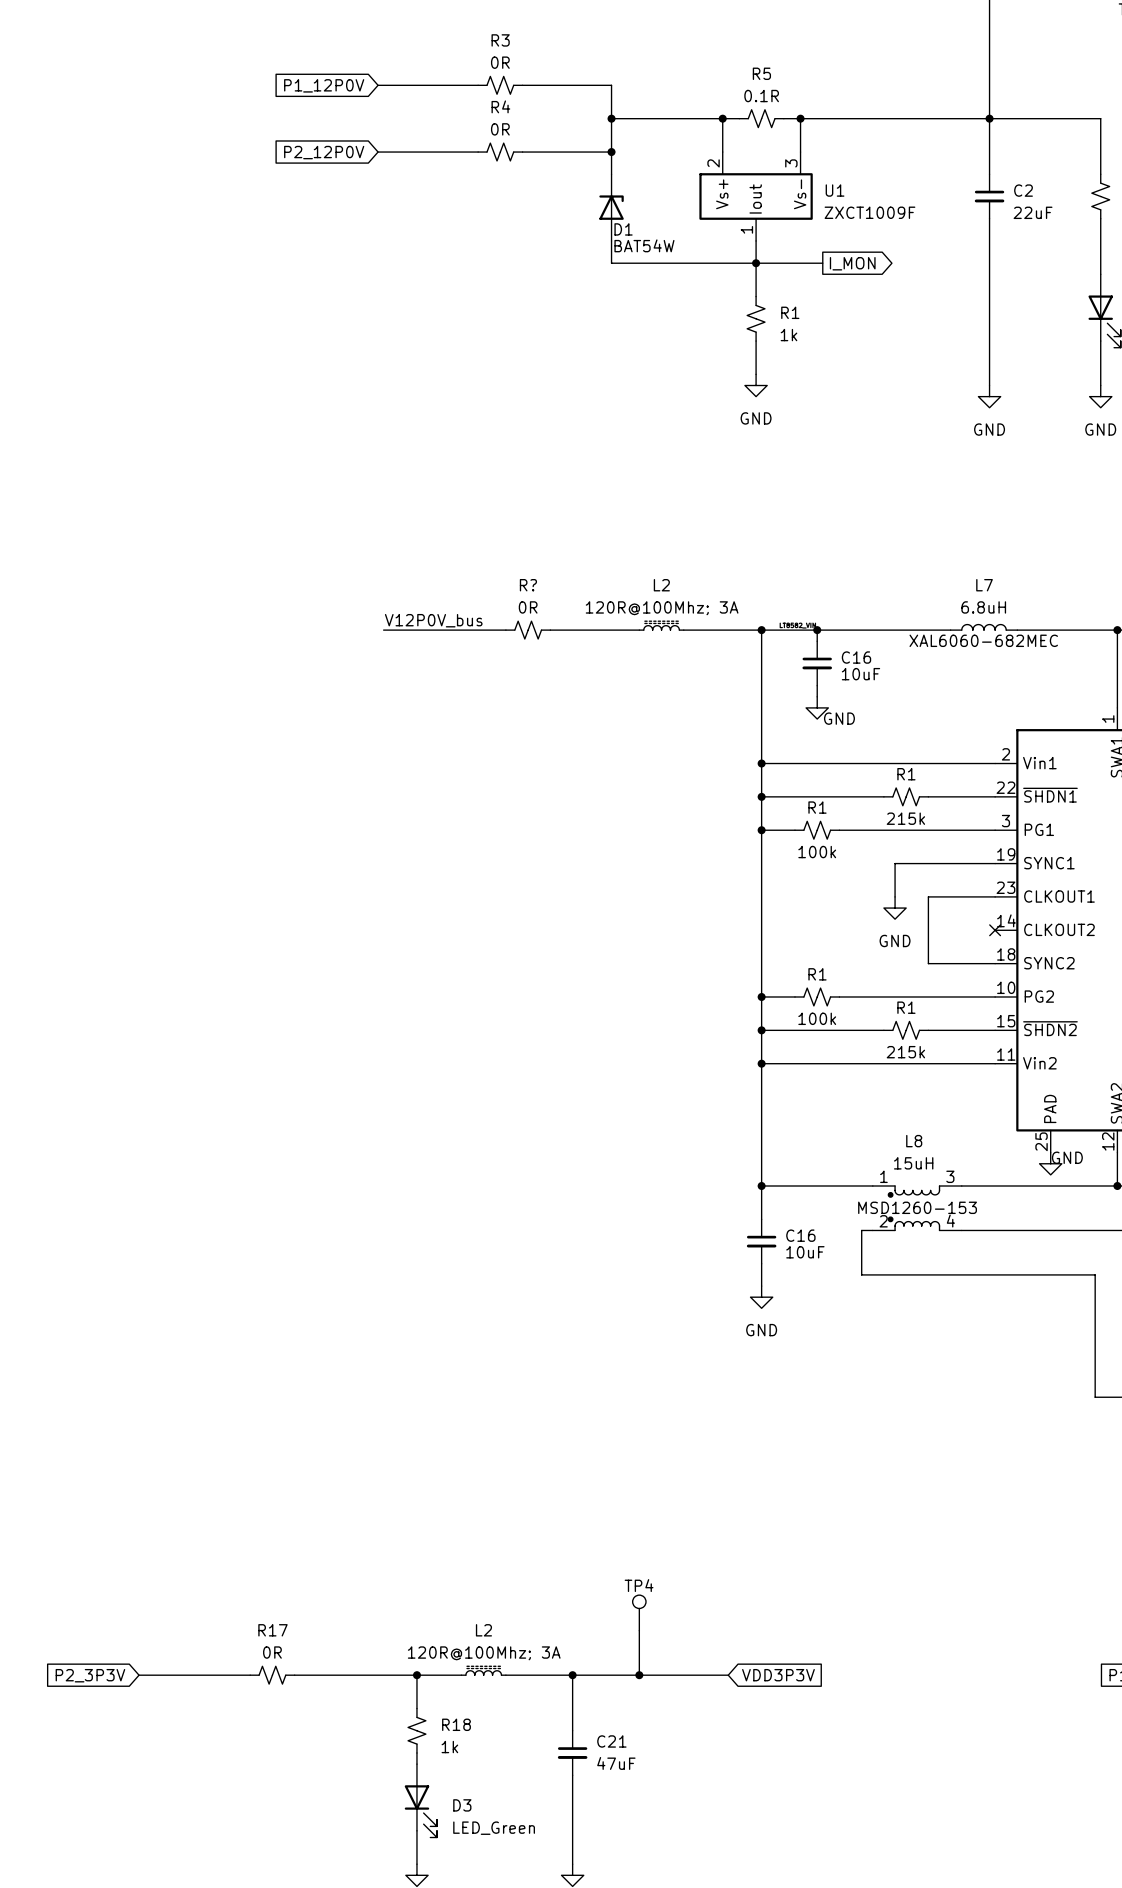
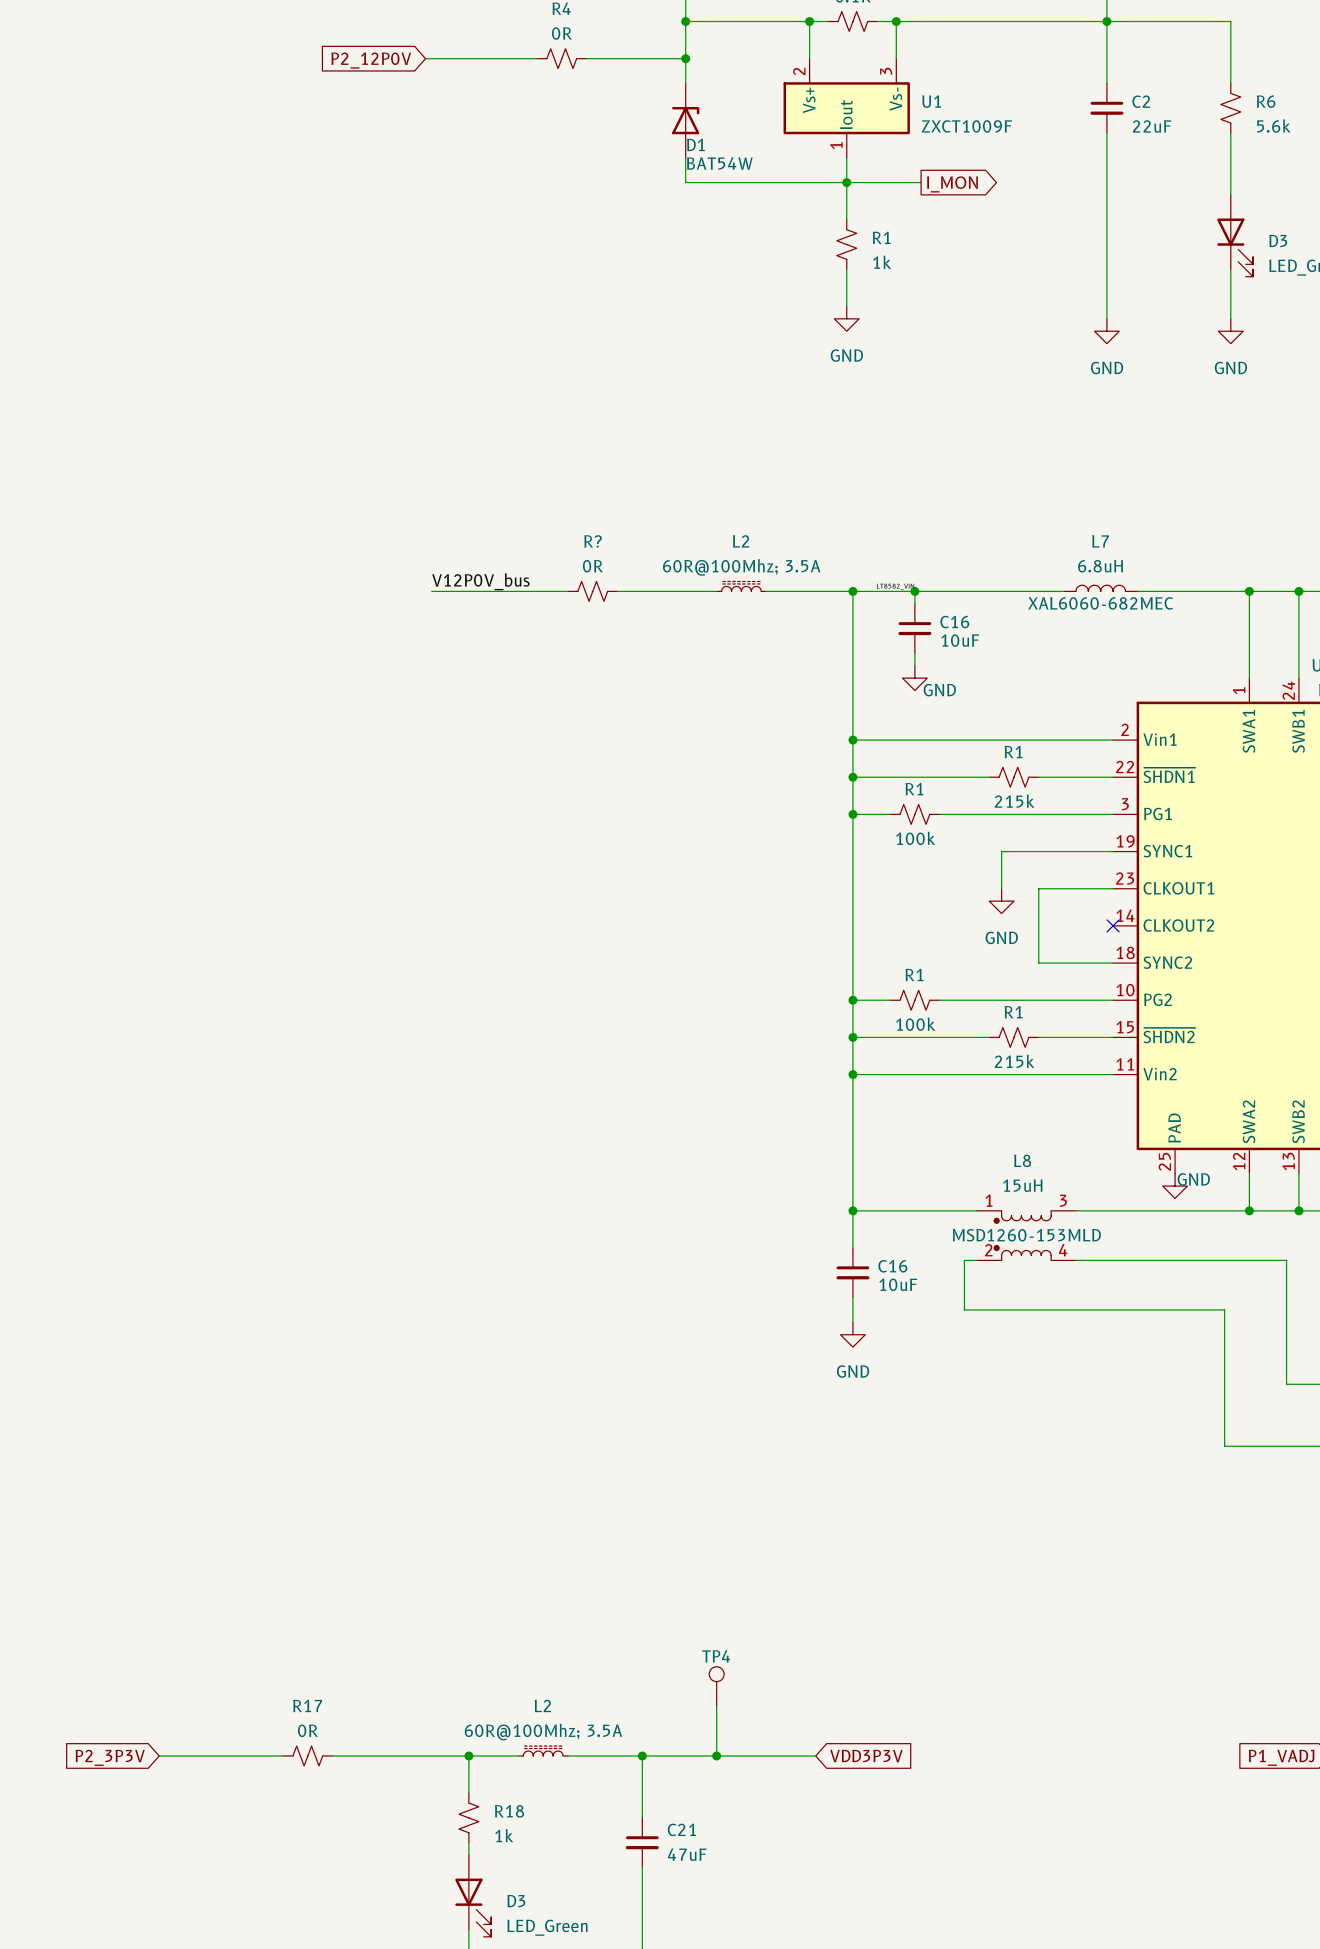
L2 value: 120R@100Mhz; 3A (662, 608) -> 60R@100Mhz; 3.5A (741, 567)
L8 text: MSD1260-153 (917, 1207) -> MSD1260-153MLD (1026, 1235)
L2 value: 120R@100Mhz; 3A (484, 1653) -> 60R@100Mhz; 3.5A (543, 1732)

